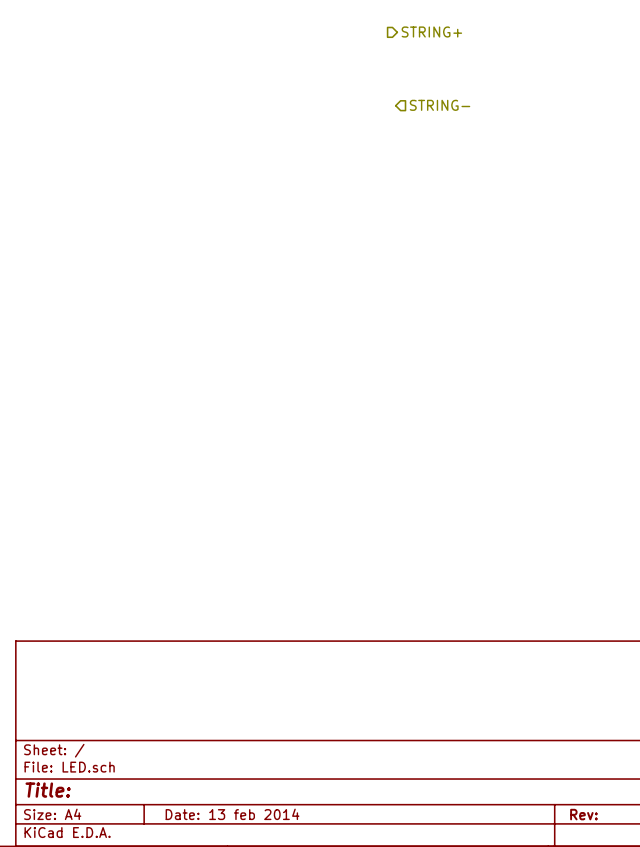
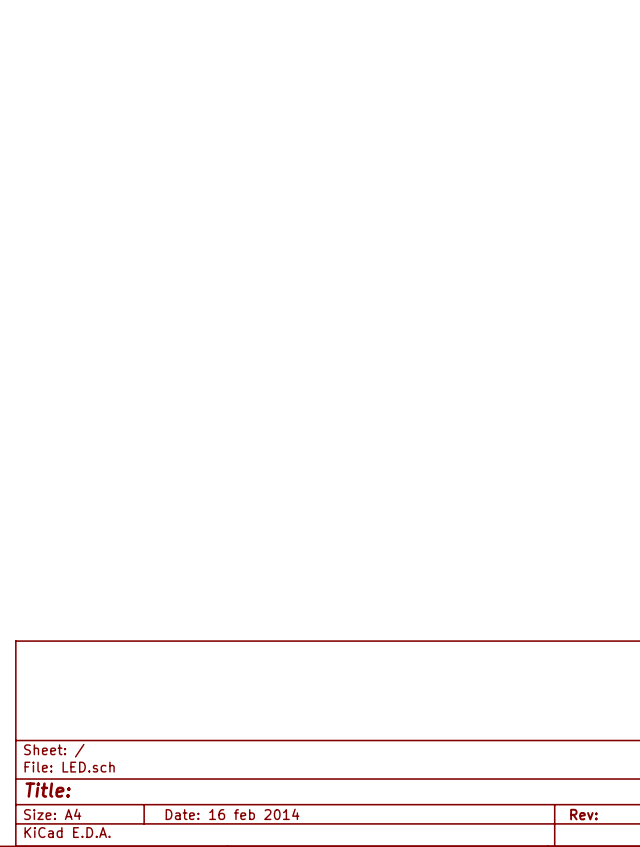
hierarchical label: STRING+ (431, 32) -> none
hierarchical label: STRING- (440, 105) -> none
title block: Date: 13 feb 2014 (232, 814) -> Date: 16 feb 2014 (232, 814)

